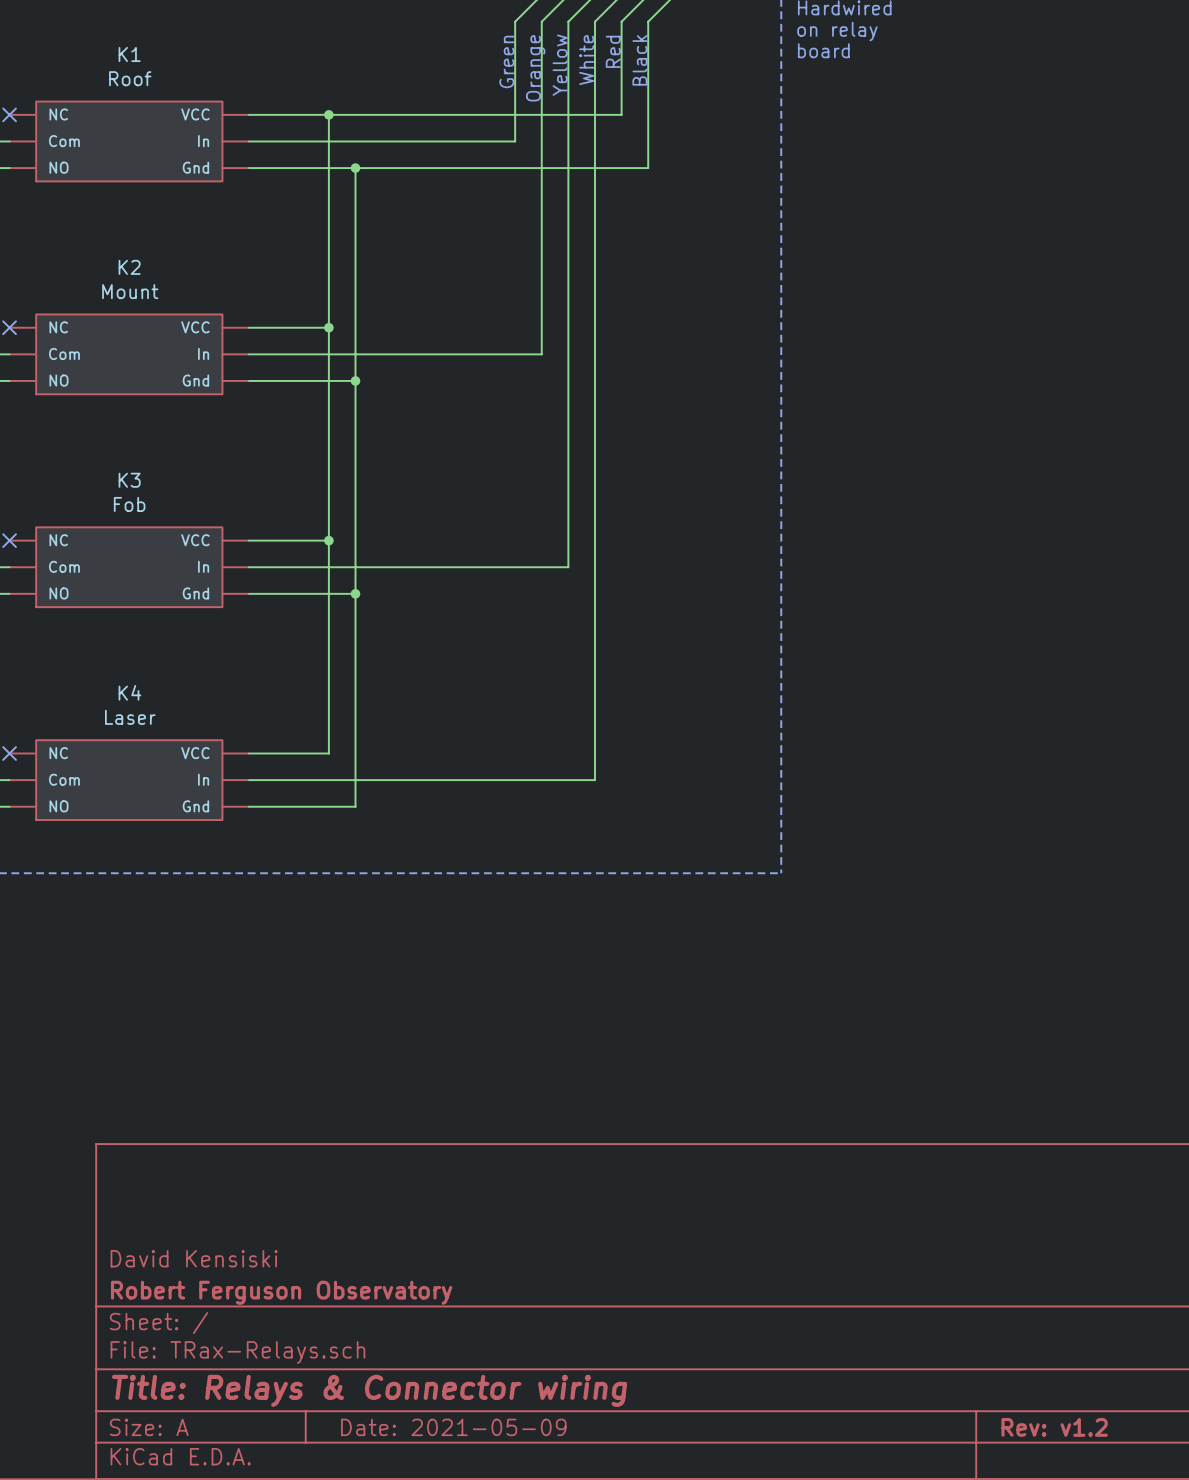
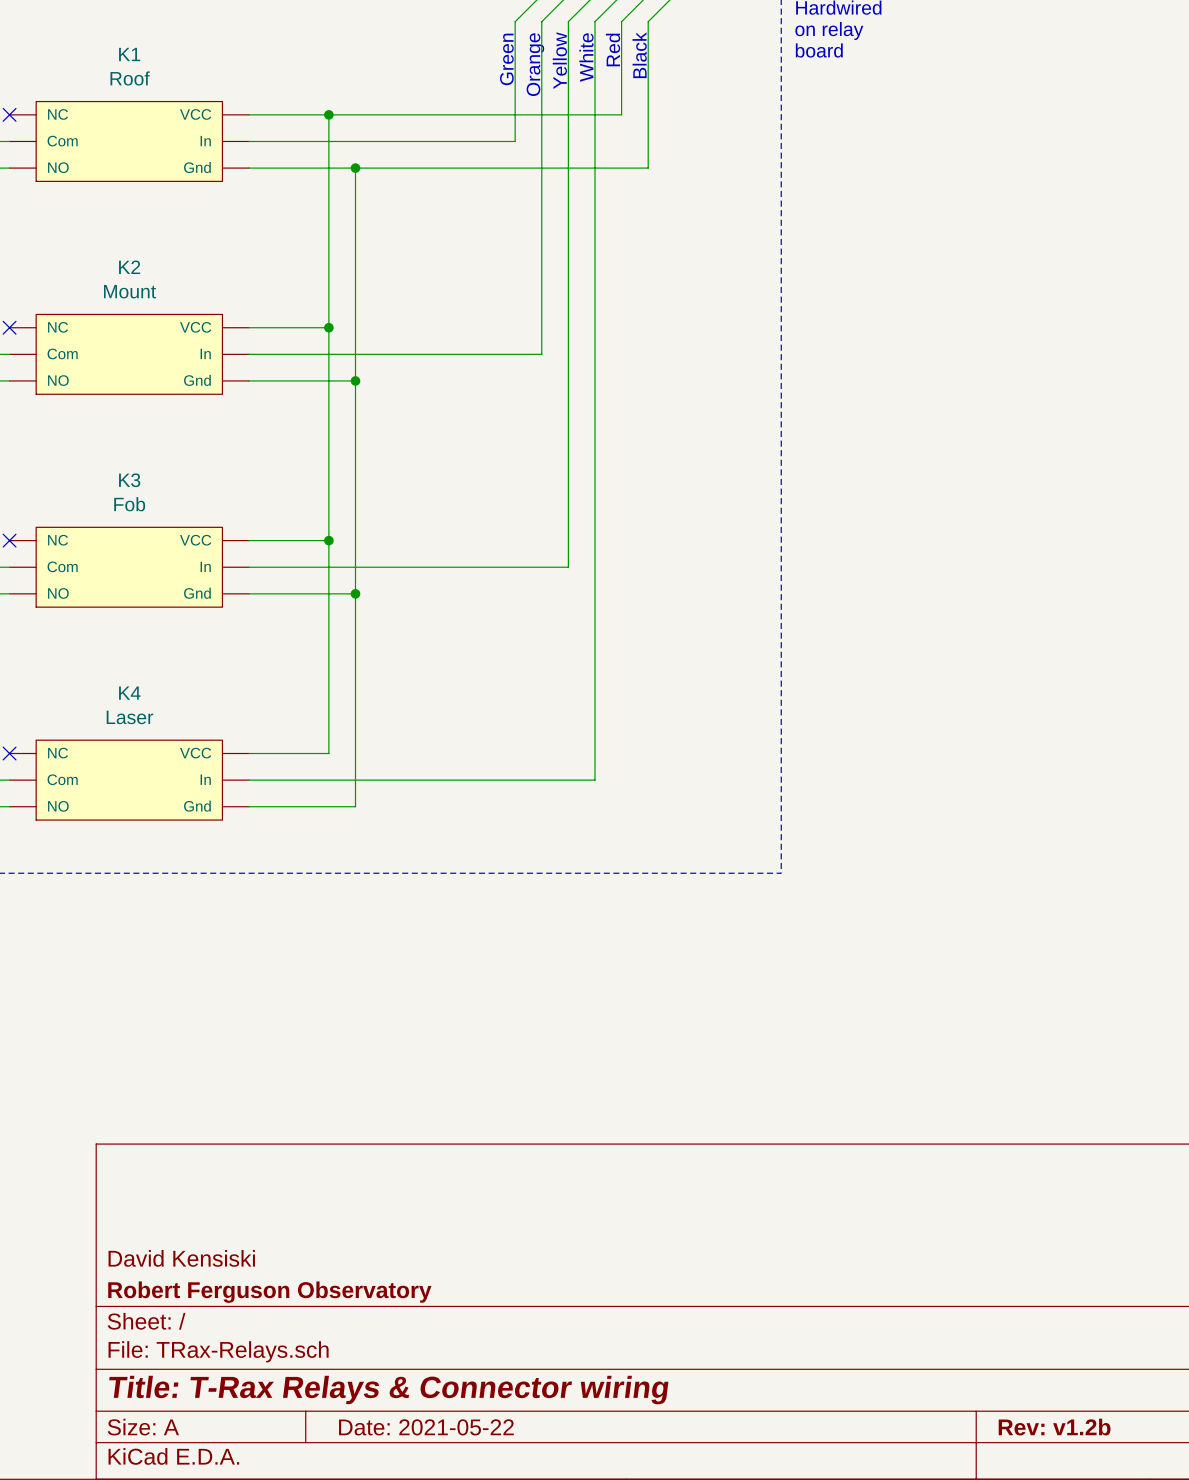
title block: Title: Relays & Connector wiring (369, 1390) -> Title: T-Rax Relays & Connector wiring (388, 1390)
title block: Date: 2021-05-09 (453, 1427) -> Date: 2021-05-22 (426, 1427)
title block: Rev: v1.2 (1054, 1427) -> Rev: v1.2b (1054, 1427)

